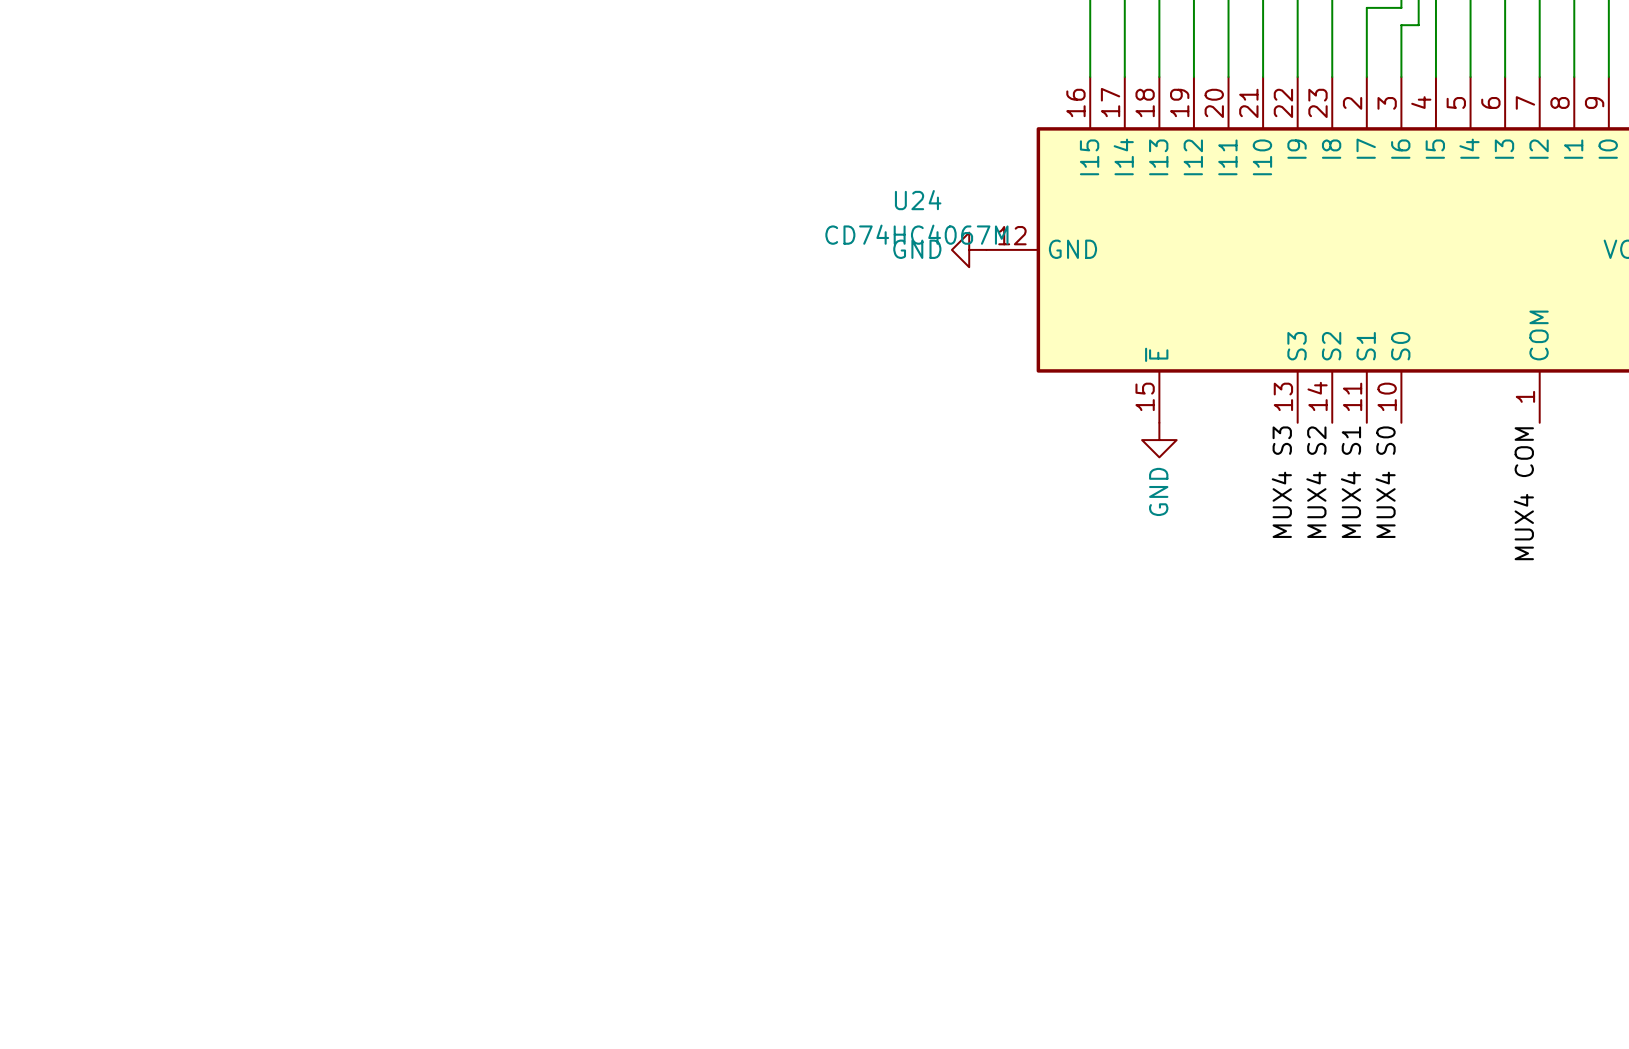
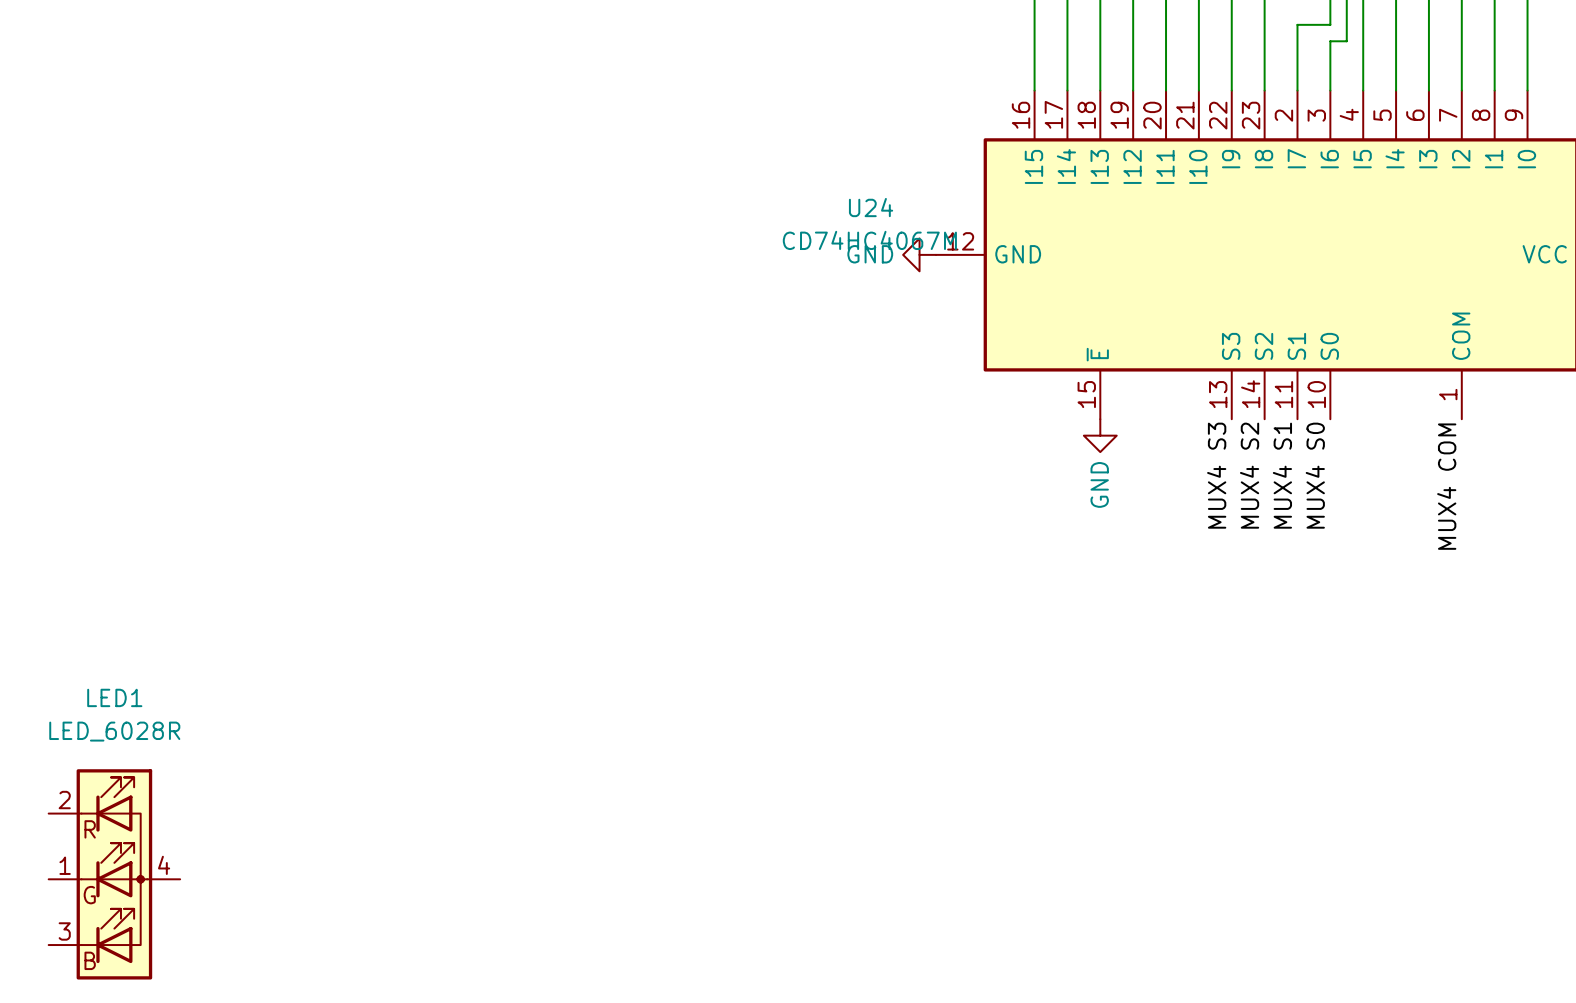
LED1: none -> LED_6028R (114, 874)

